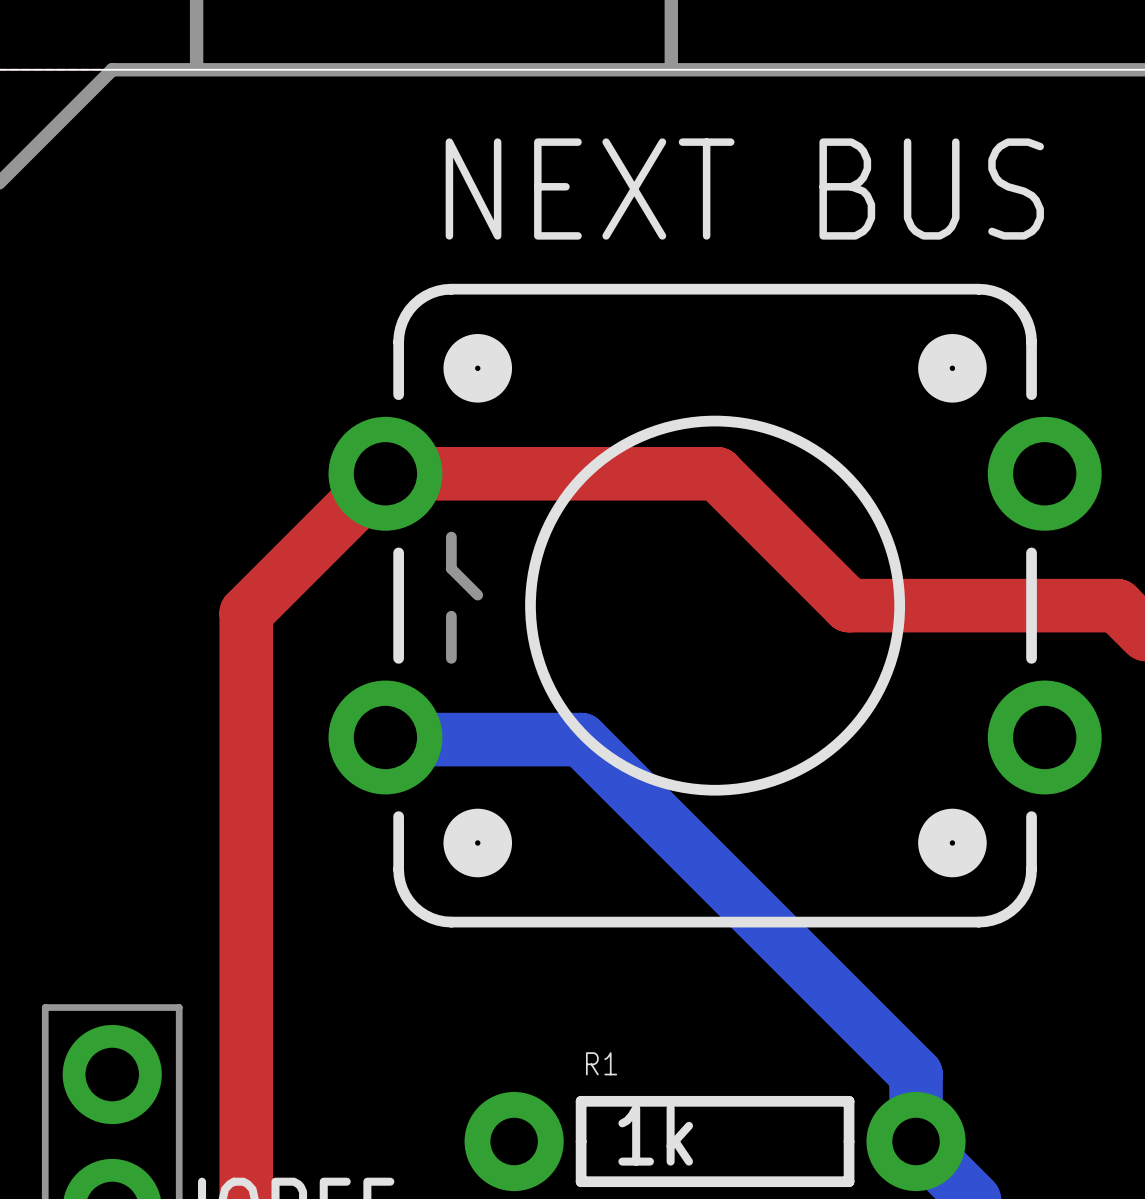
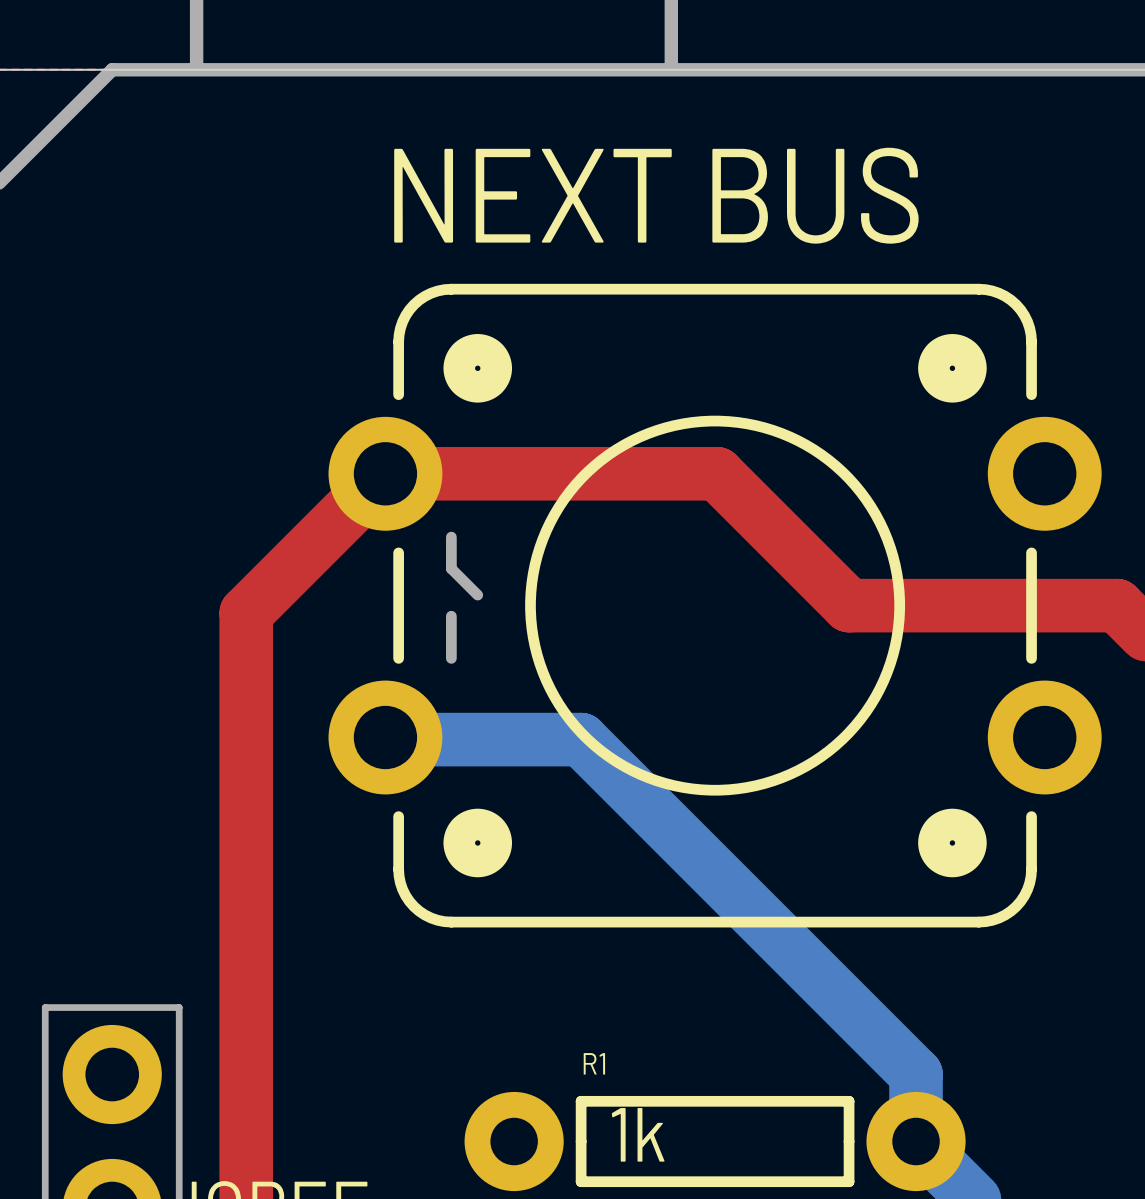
text position: NEXT BUS (744, 189) -> NEXT BUS (656, 195)

